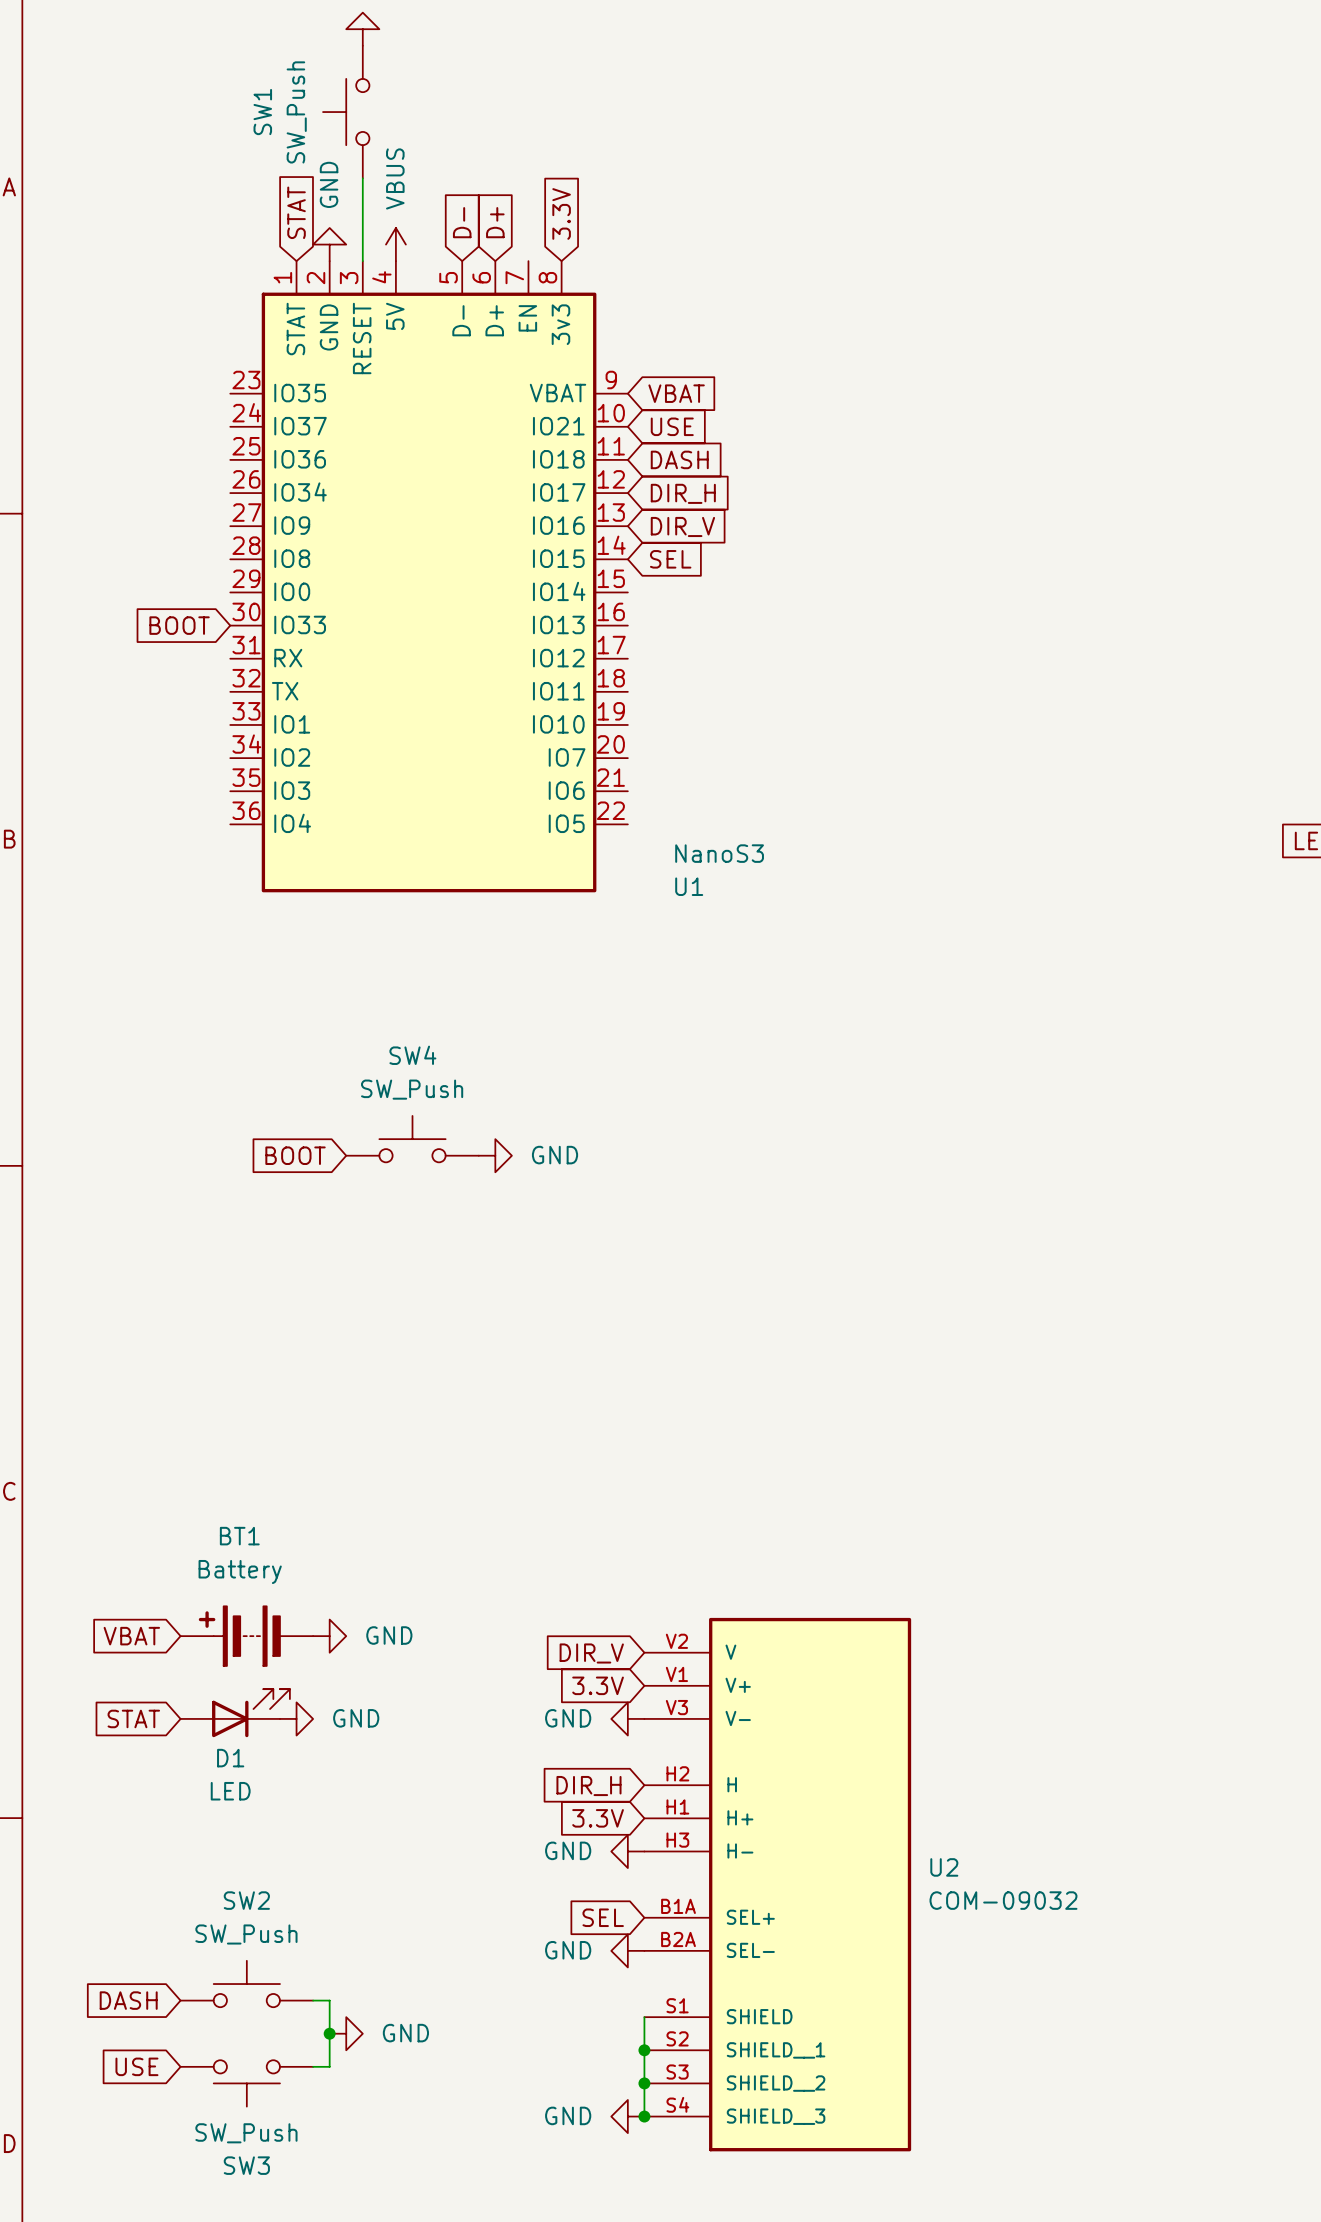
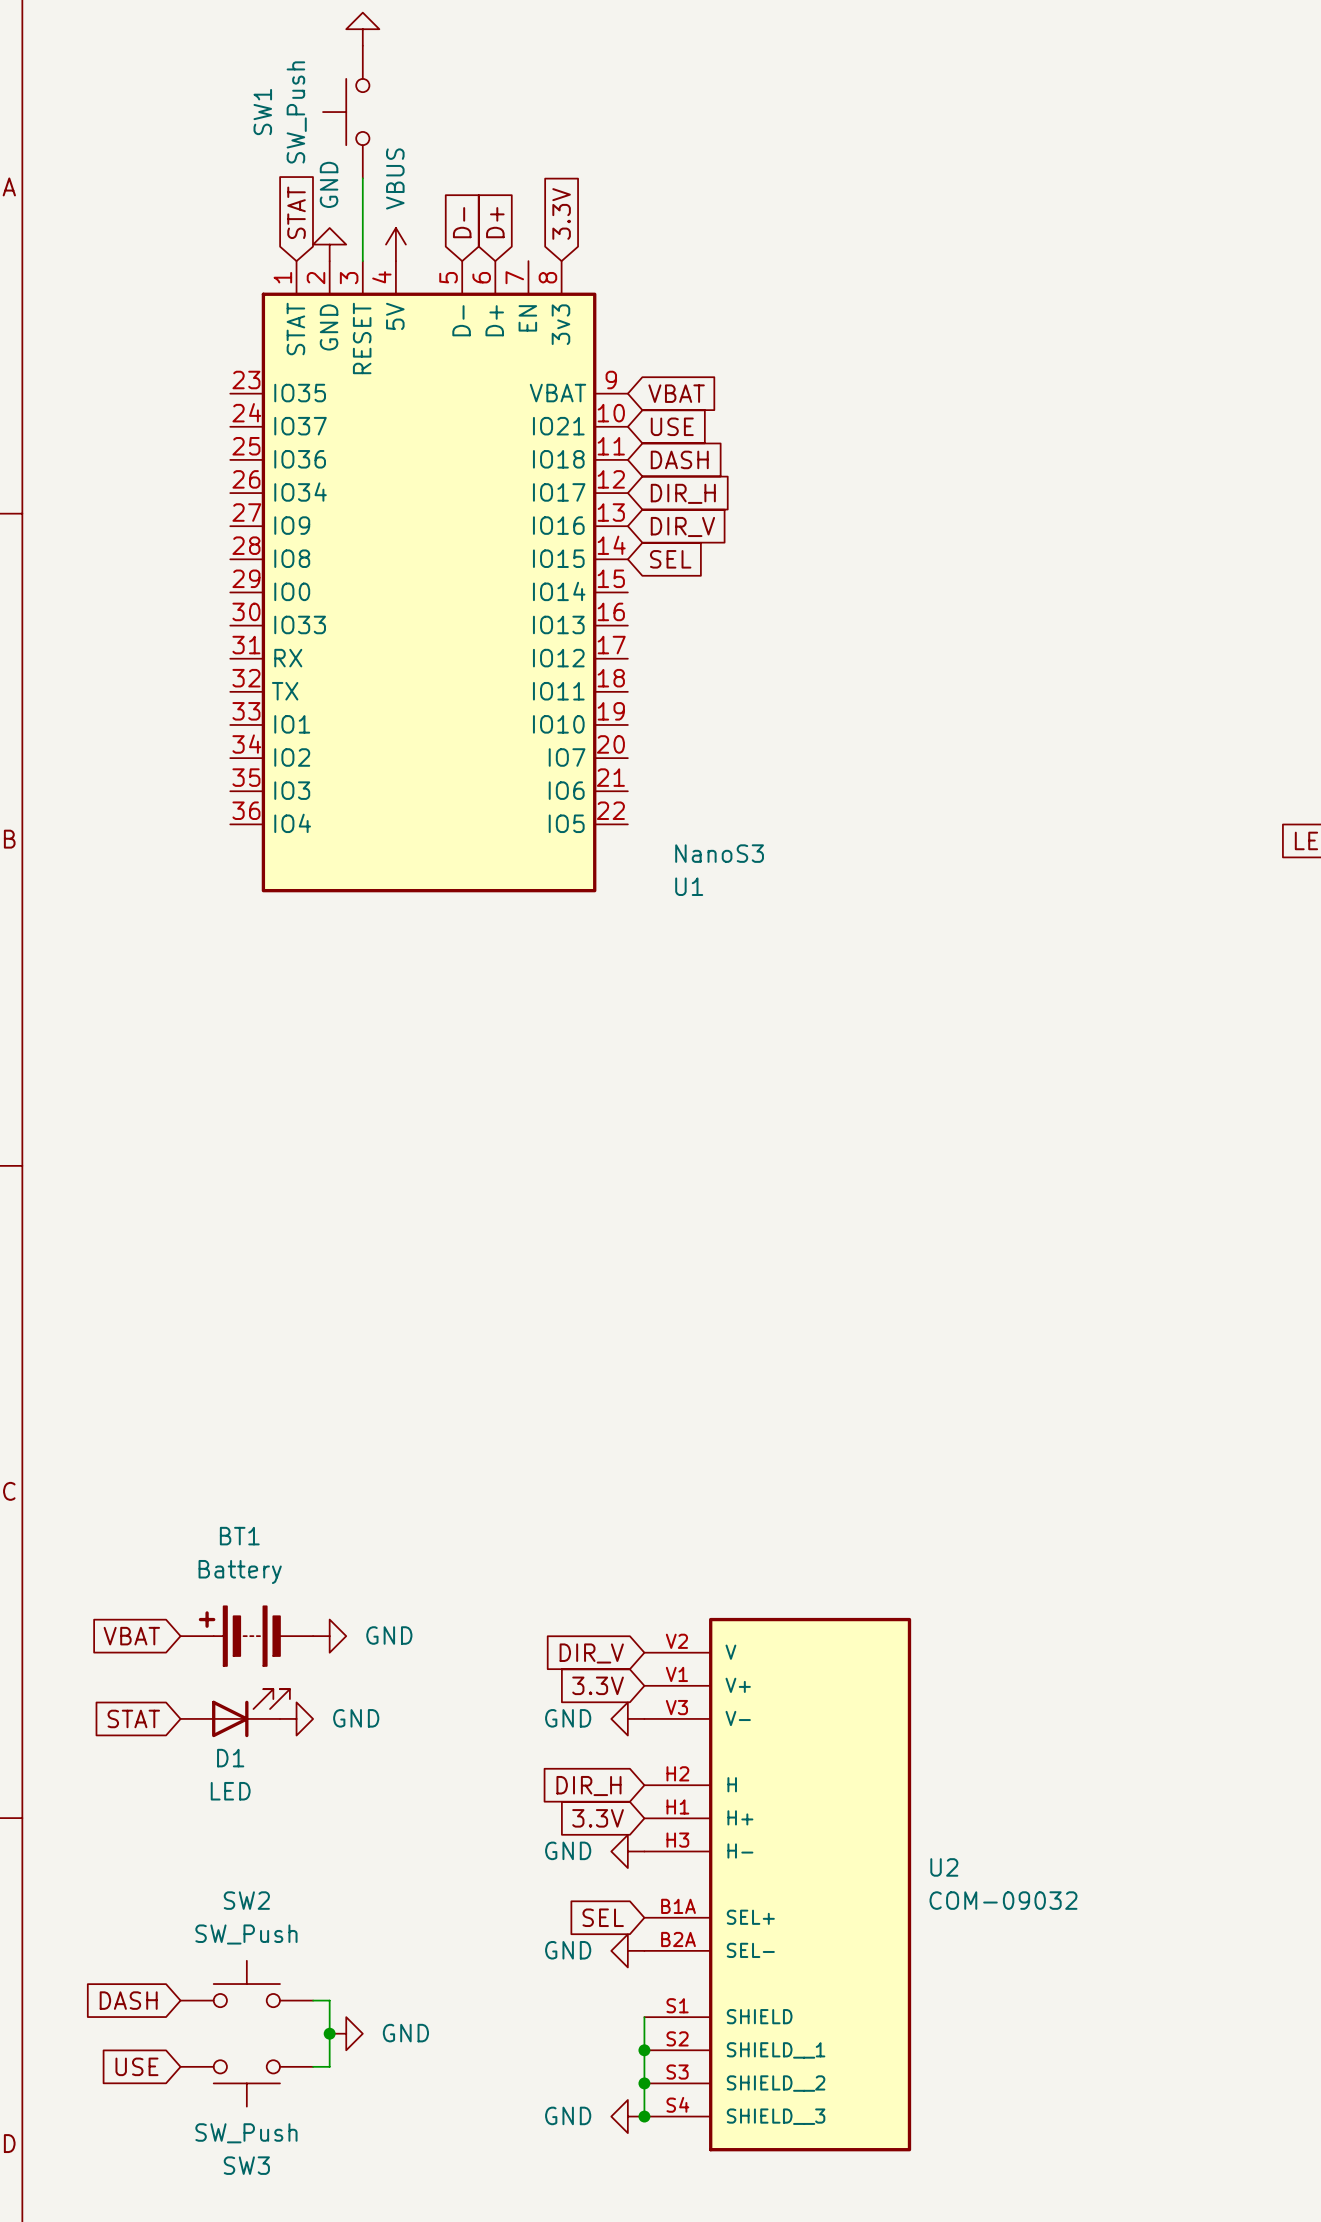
global label: BOOT (179, 625) -> none
SW4: SW_Push (412, 1139) -> none
global label: BOOT (295, 1155) -> none
power symbol: GND (495, 1155) -> none

